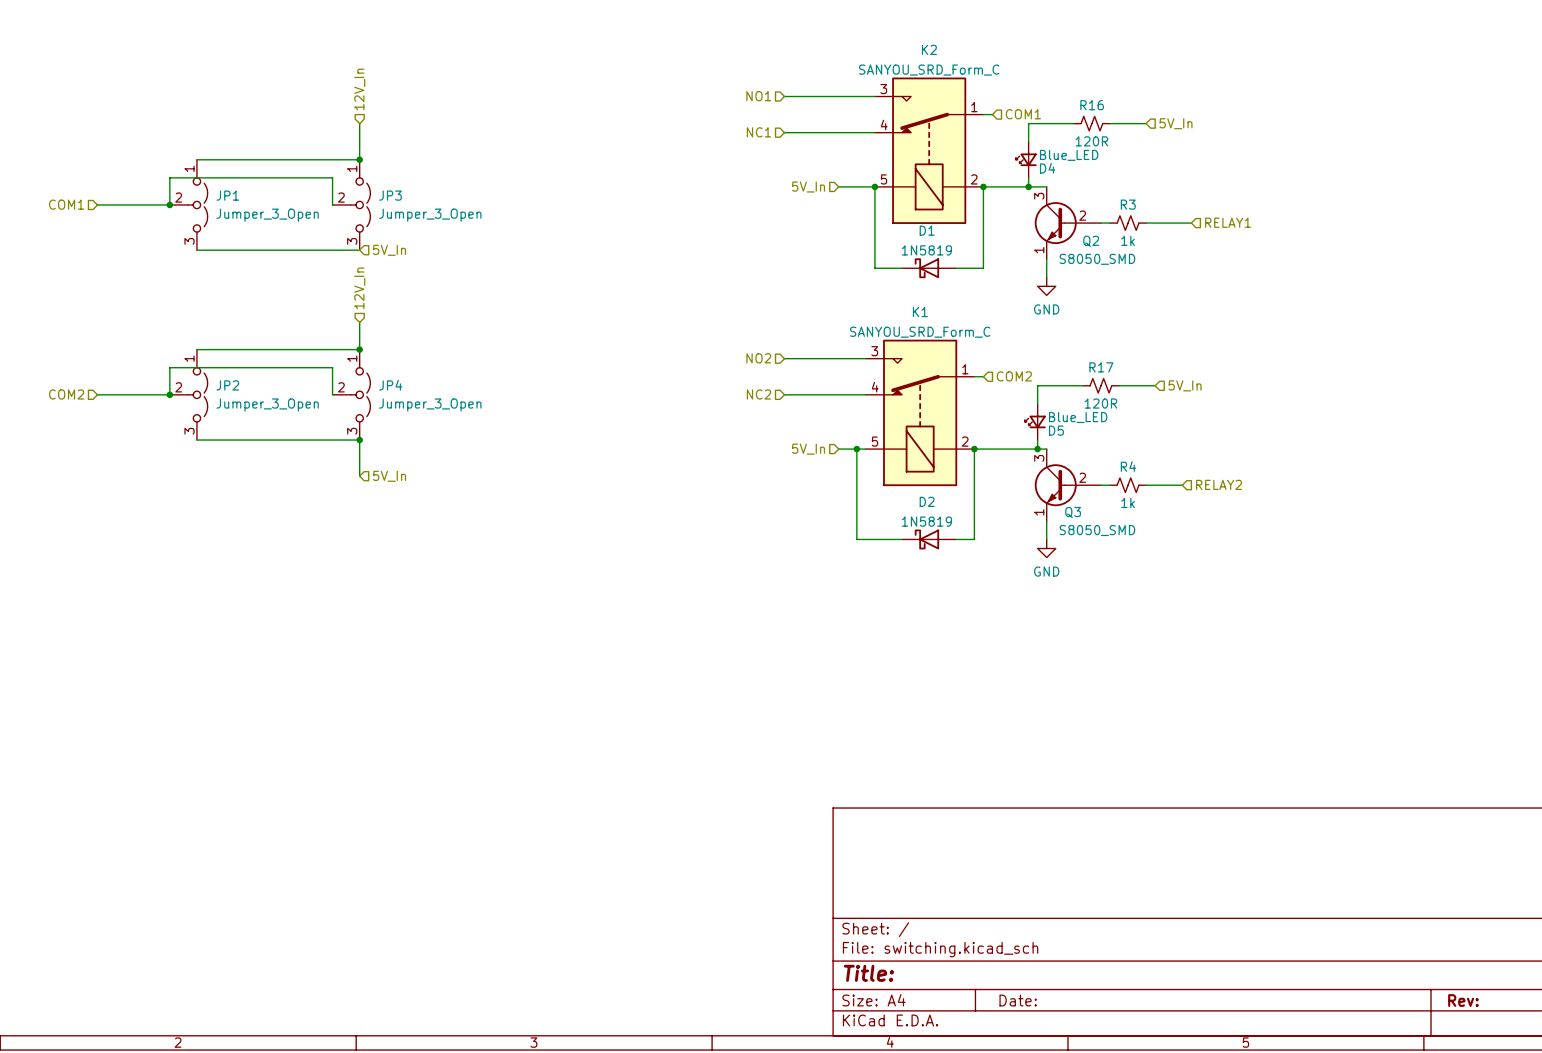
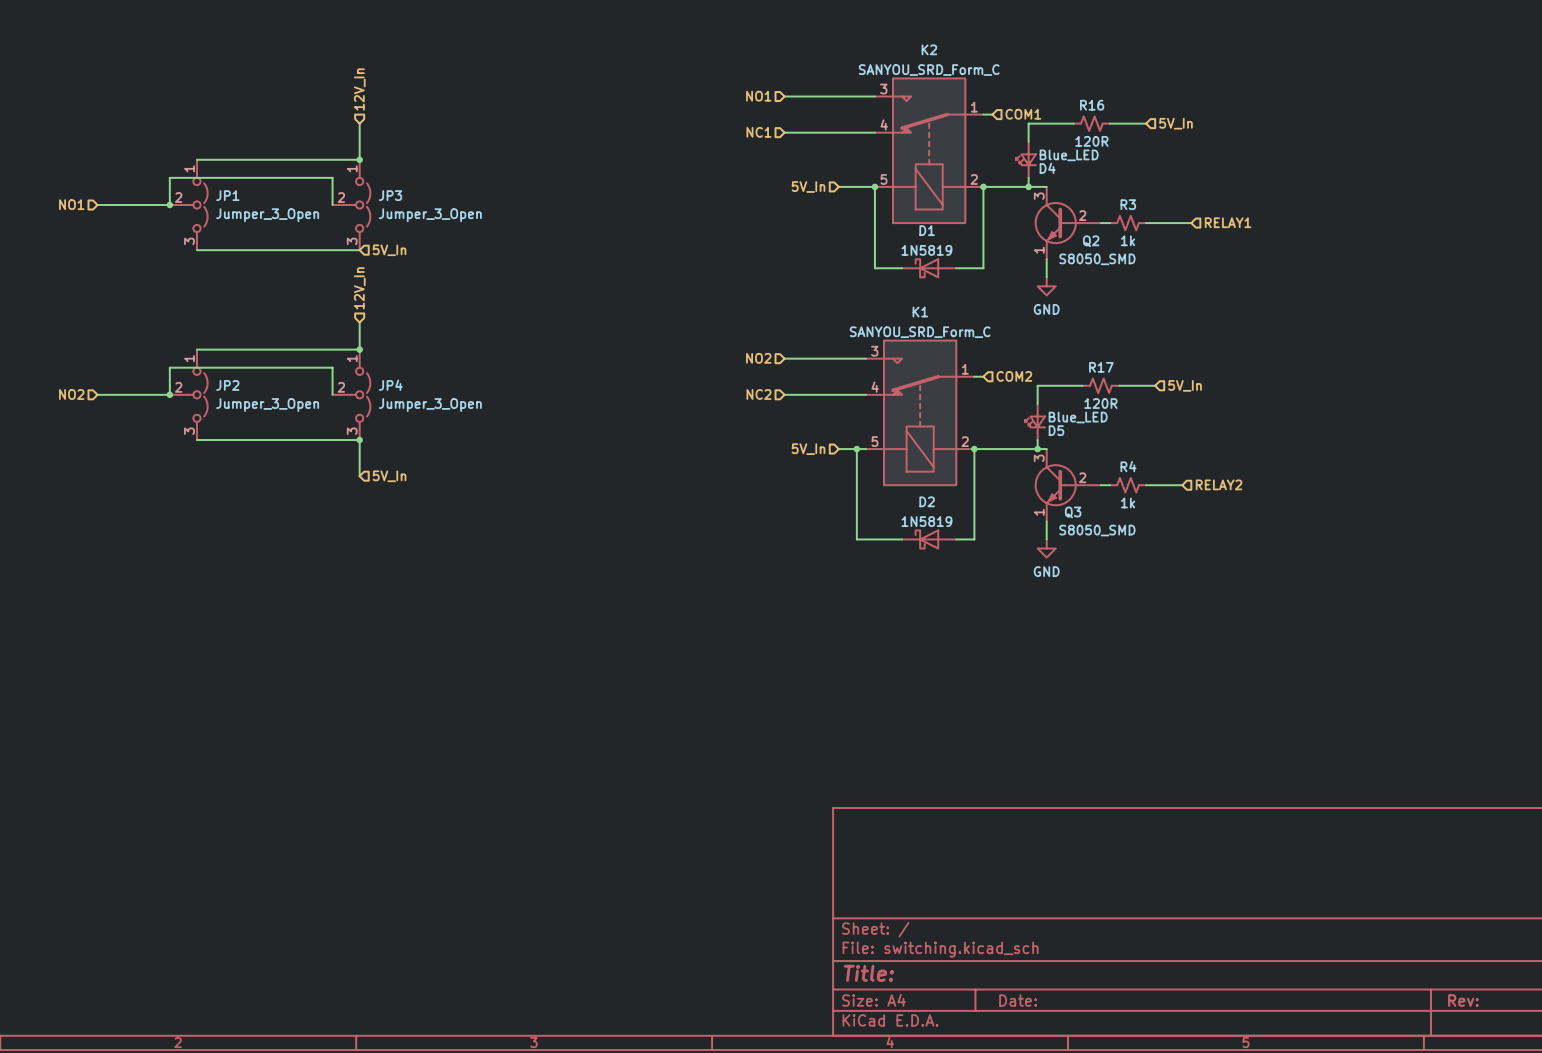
hierarchical label: COM1 (66, 204) -> NO1 (71, 204)
hierarchical label: COM2 (66, 394) -> NO2 (71, 394)

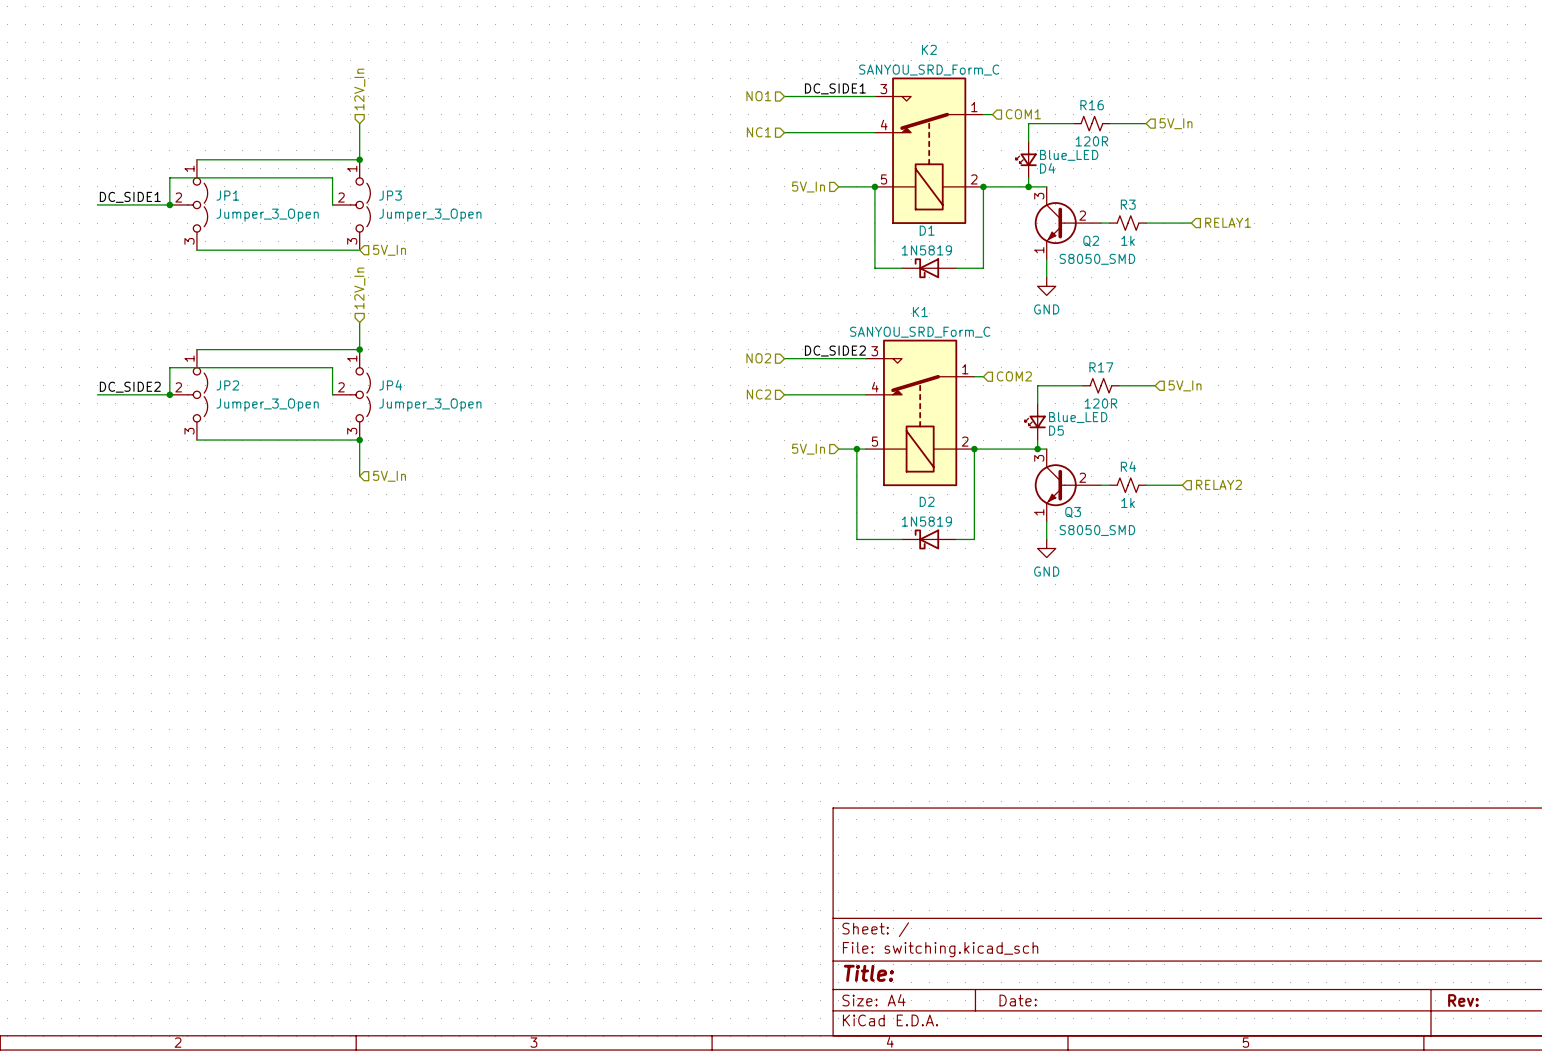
label: none -> DC_SIDE1 (835, 88)
label: none -> DC_SIDE1 (130, 197)
hierarchical label: NO1 (71, 204) -> none
label: none -> DC_SIDE2 (835, 351)
label: none -> DC_SIDE2 (130, 387)
hierarchical label: NO2 (71, 394) -> none

